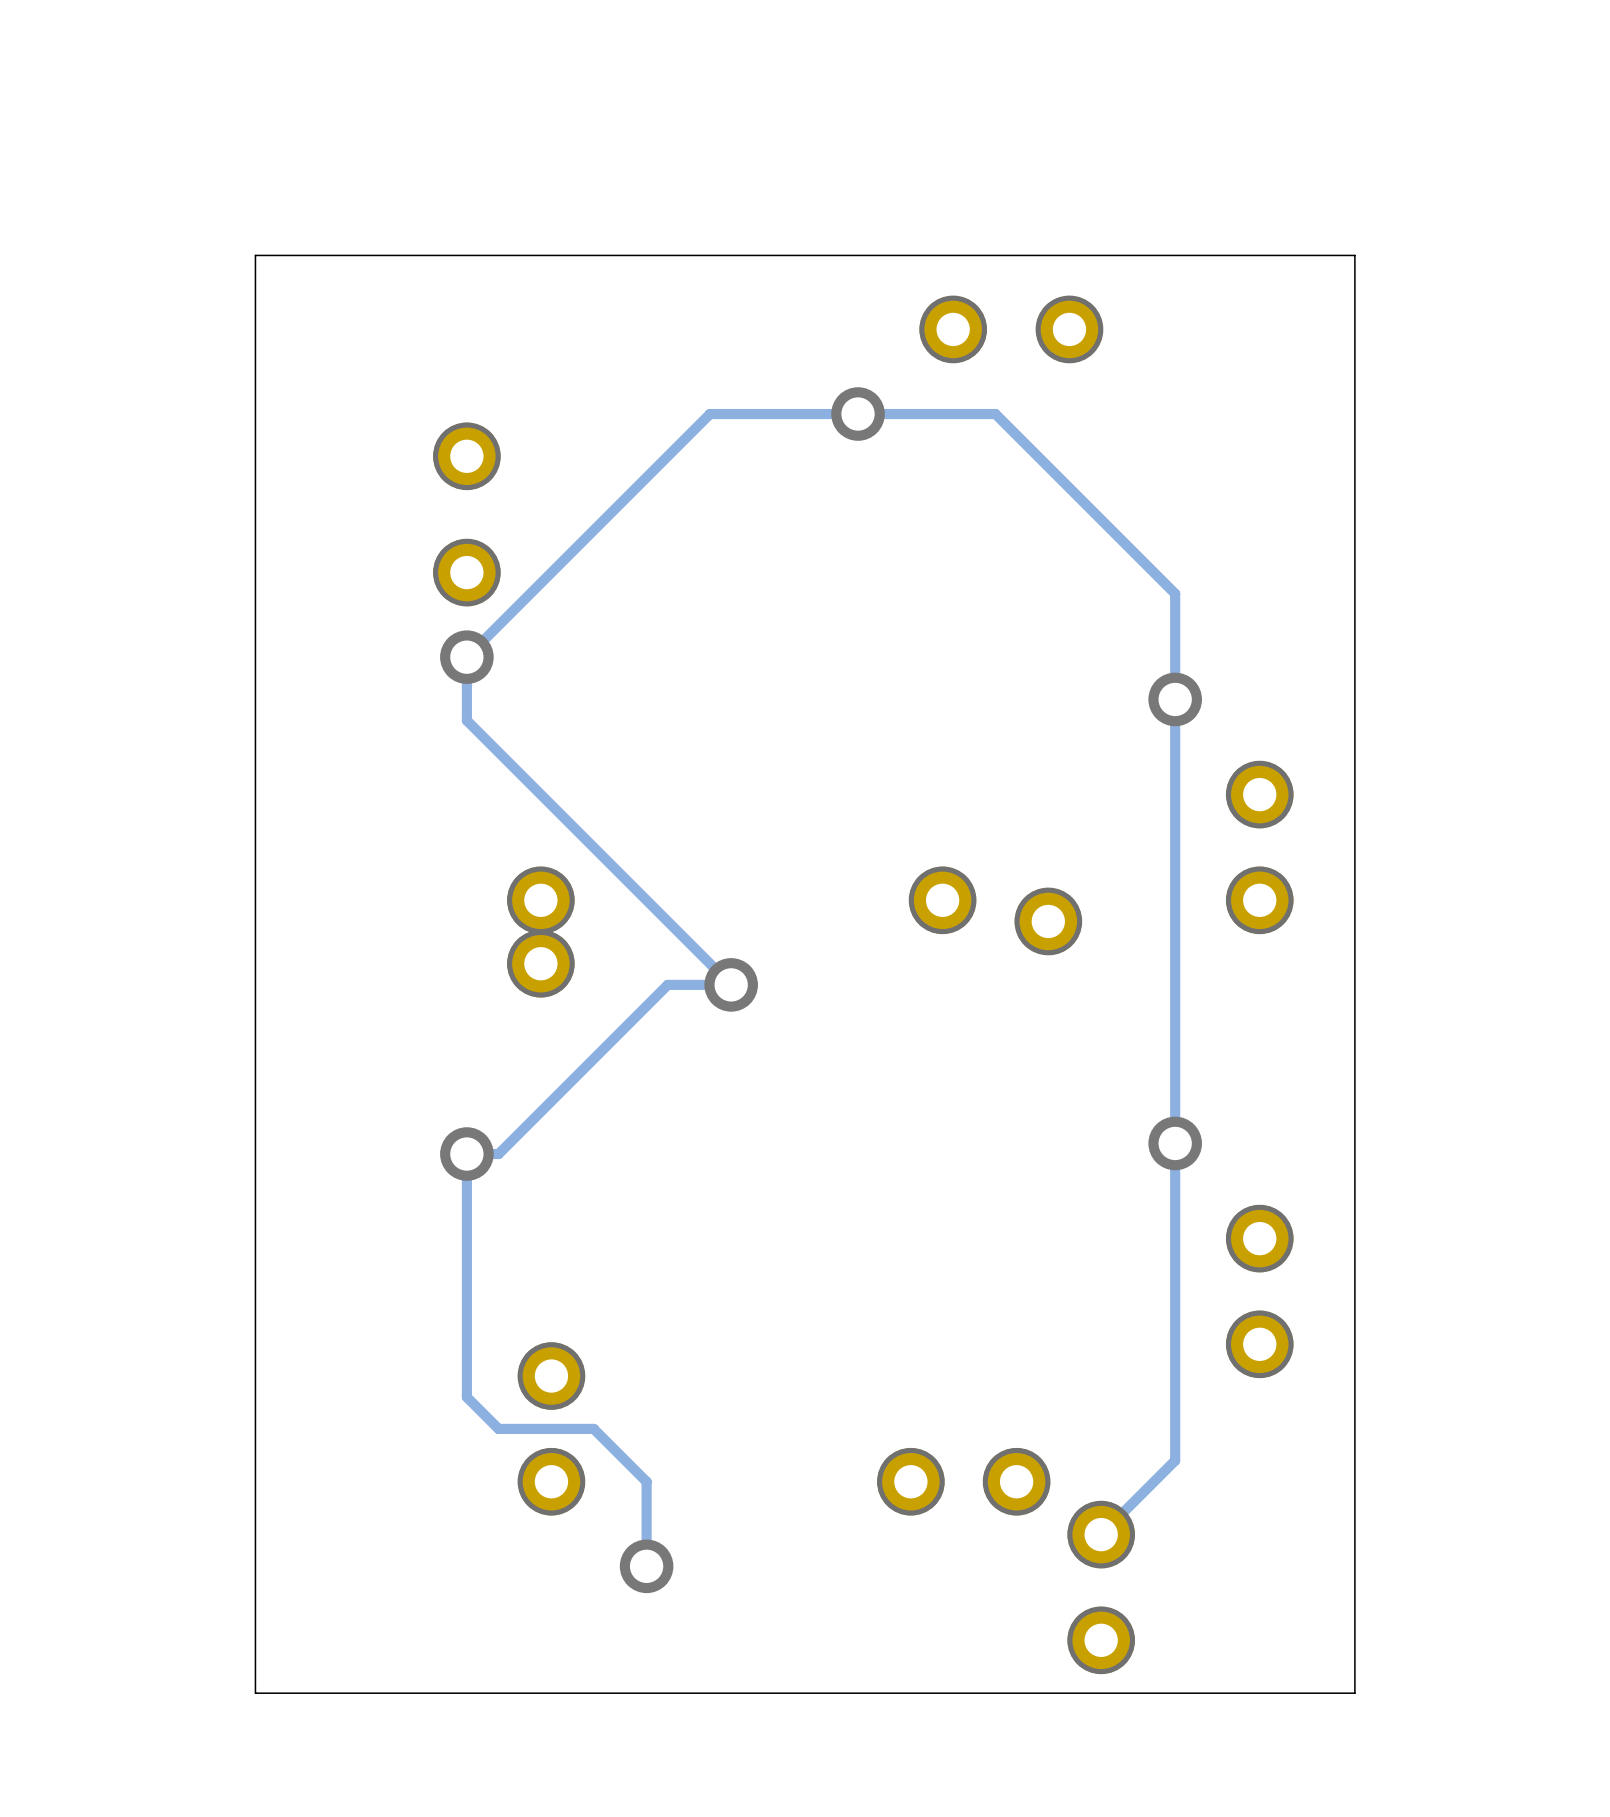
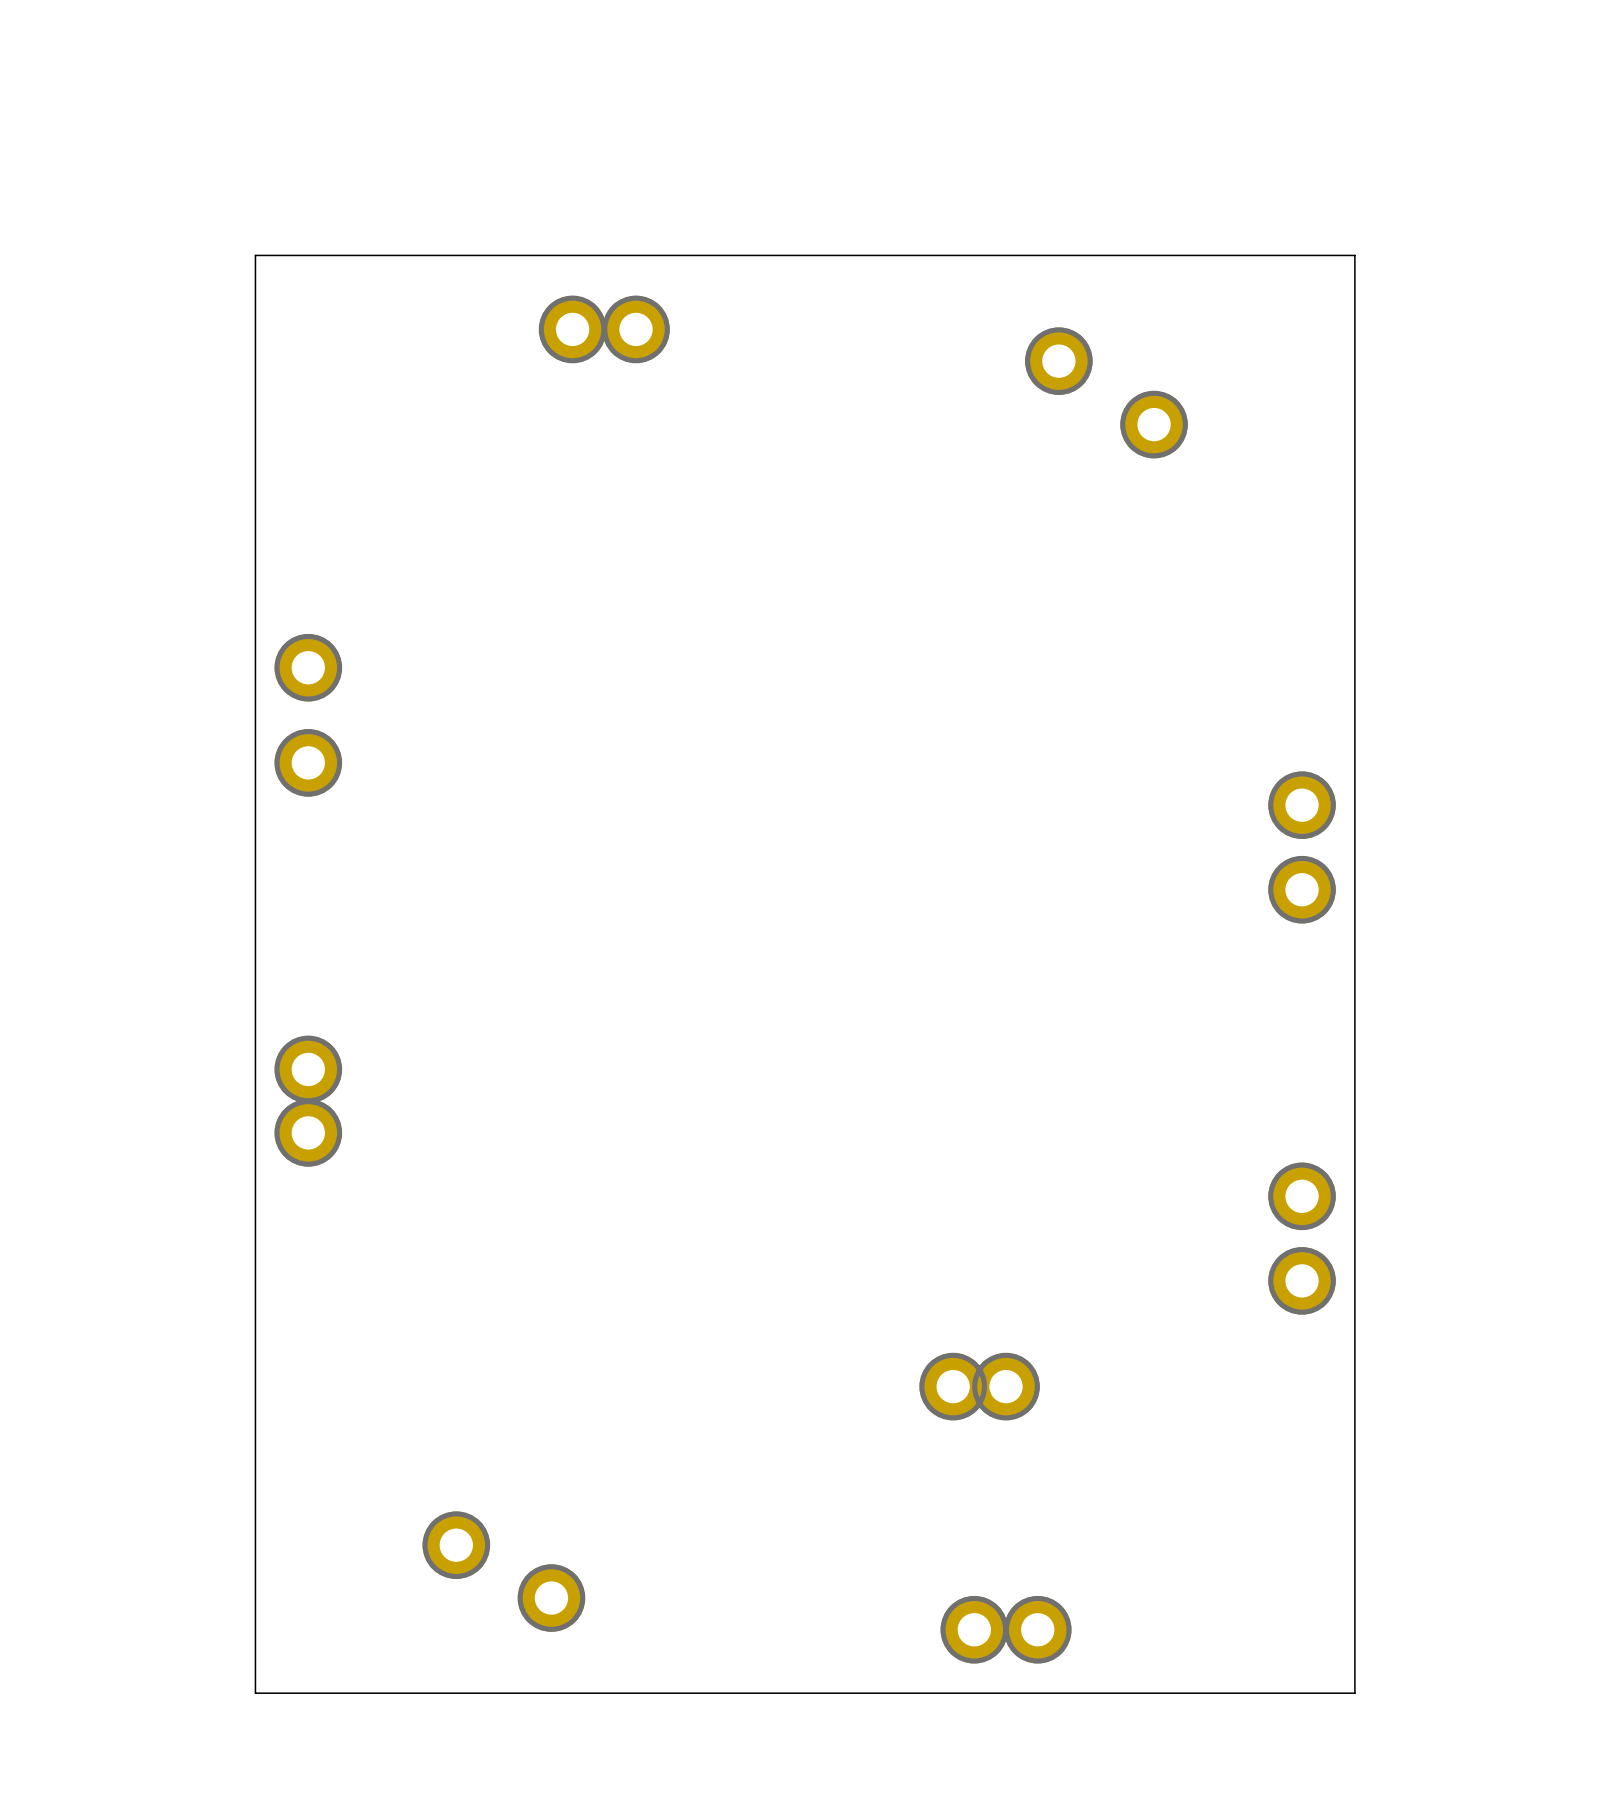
part: none -> (572, 329)
part: none -> (636, 329)
part: (953, 329) -> none
part position: (1069, 329) -> (1058, 361)
via: (858, 414) -> none
part: none -> (1154, 424)
part: (466, 456) -> none
part: (466, 572) -> none
via: (466, 657) -> none
part: none -> (308, 667)
via: (1175, 699) -> none
part: none -> (308, 762)
part position: (1259, 794) -> (1302, 805)
part: (540, 900) -> none
part: (942, 900) -> none
part position: (1259, 900) -> (1302, 889)
part: (1048, 921) -> none
part: (540, 963) -> none
via: (731, 984) -> none
part: none -> (308, 1069)
part: none -> (308, 1132)
via: (1175, 1143) -> none
via: (466, 1154) -> none
part: none -> (1302, 1196)
part: (1259, 1238) -> none
part: none -> (1302, 1280)
part: (1259, 1344) -> none
part: (551, 1376) -> none
part: none -> (953, 1386)
part: none -> (1006, 1386)
part: (551, 1481) -> none
part: (910, 1481) -> none
part: (1016, 1481) -> none
track: (1101, 1534) (1175, 1460) (1175, 593) (995, 414) (710, 414) (466, 657) (466, 720) (731, 984) (667, 984) (498, 1154) (466, 1154) (466, 1397) (498, 1428) (593, 1428) (646, 1481) (646, 1566) -> none
part: (1101, 1534) -> none
part: none -> (456, 1545)
via: (646, 1566) -> none
part: none -> (551, 1598)
part: none -> (974, 1629)
part: none -> (1037, 1629)
part: (1101, 1640) -> none

